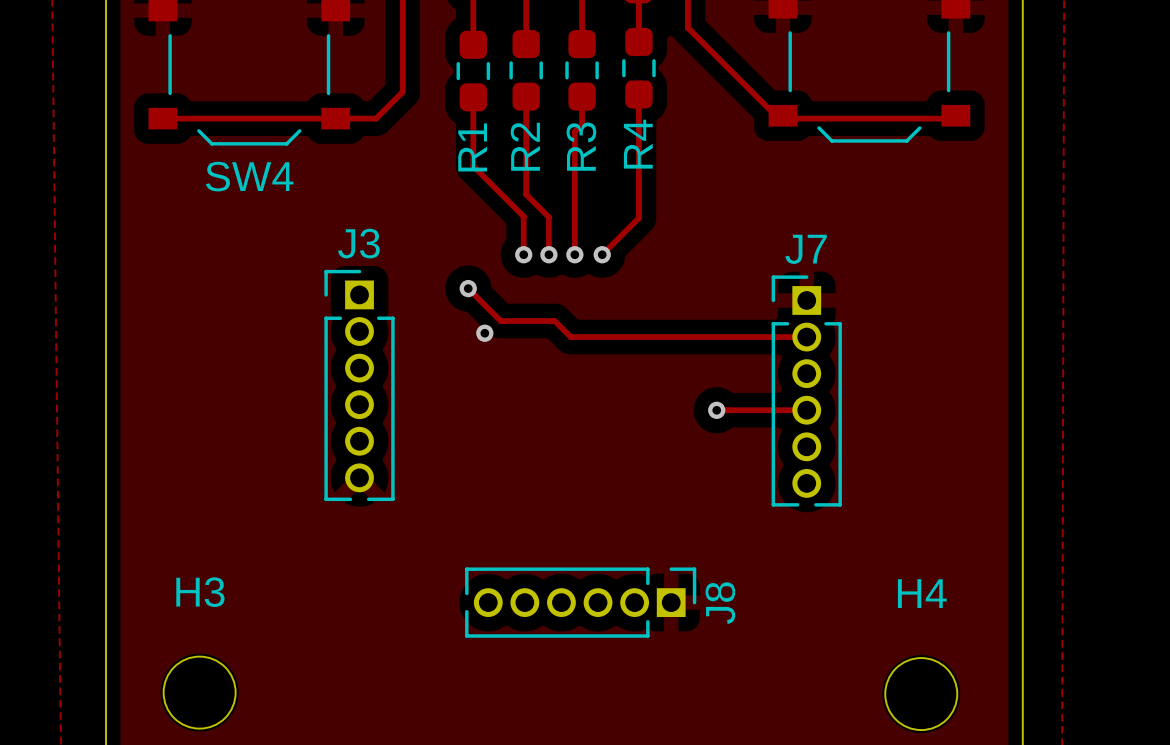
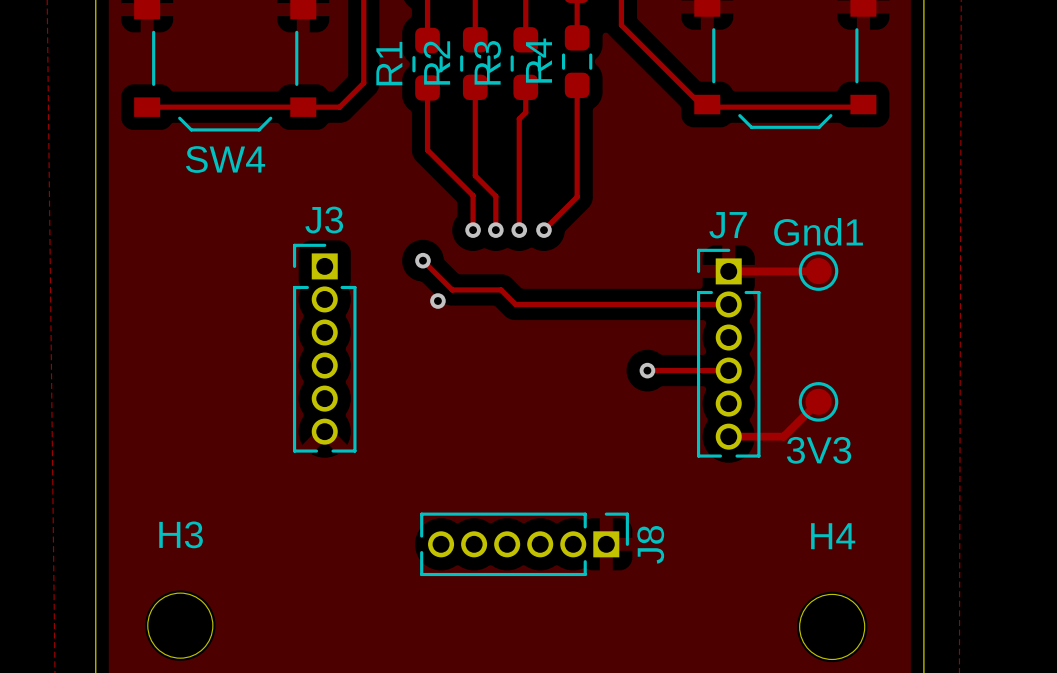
R4 name position: R4 (638, 144) -> R4 (538, 60)
R2 name position: R2 (525, 146) -> R2 (436, 62)
R3 name position: R3 (581, 146) -> R3 (487, 62)
R1 name position: R1 (472, 147) -> R1 (389, 63)
track: none -> (728, 271) (818, 271)
Gnd1: none -> (818, 271)
track: none -> (818, 401) (783, 436) (728, 436)
3V3: none -> (818, 401)

